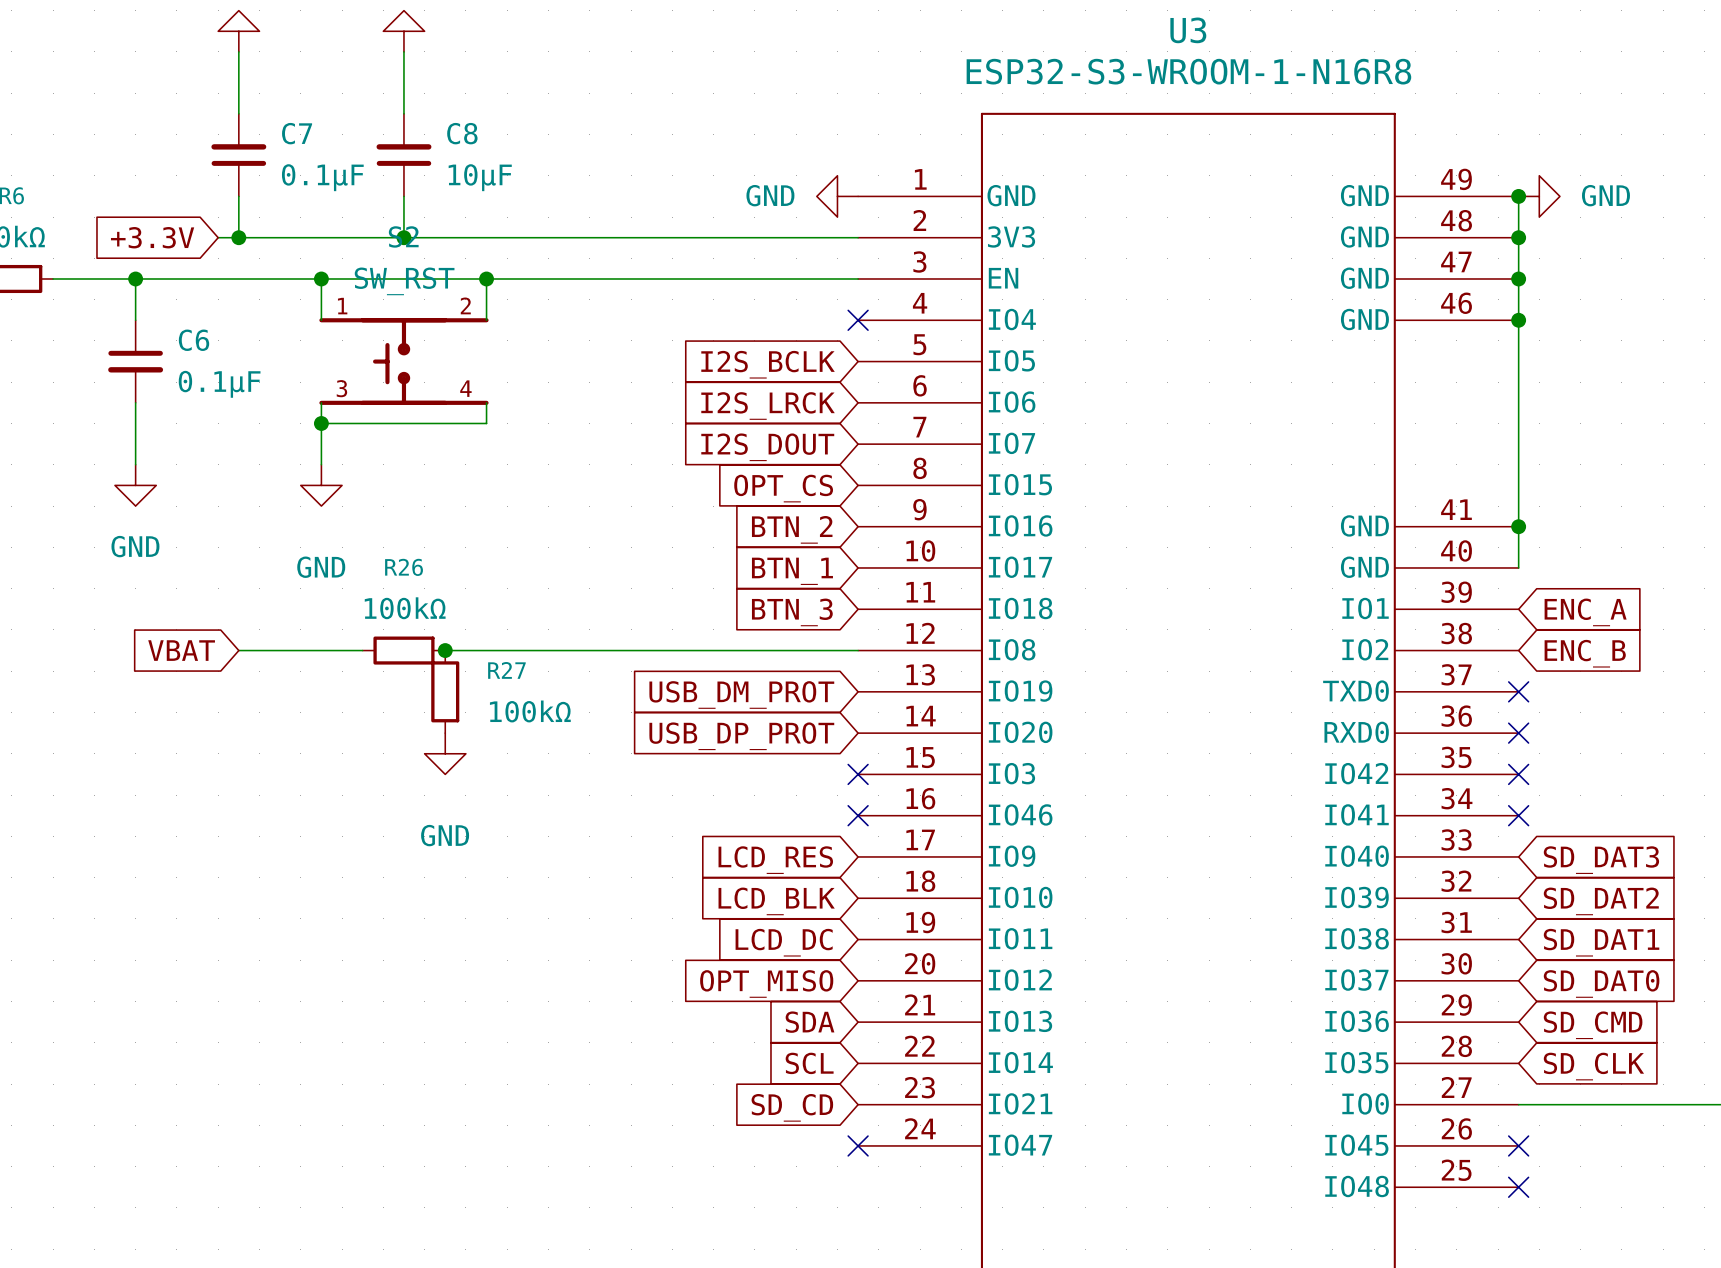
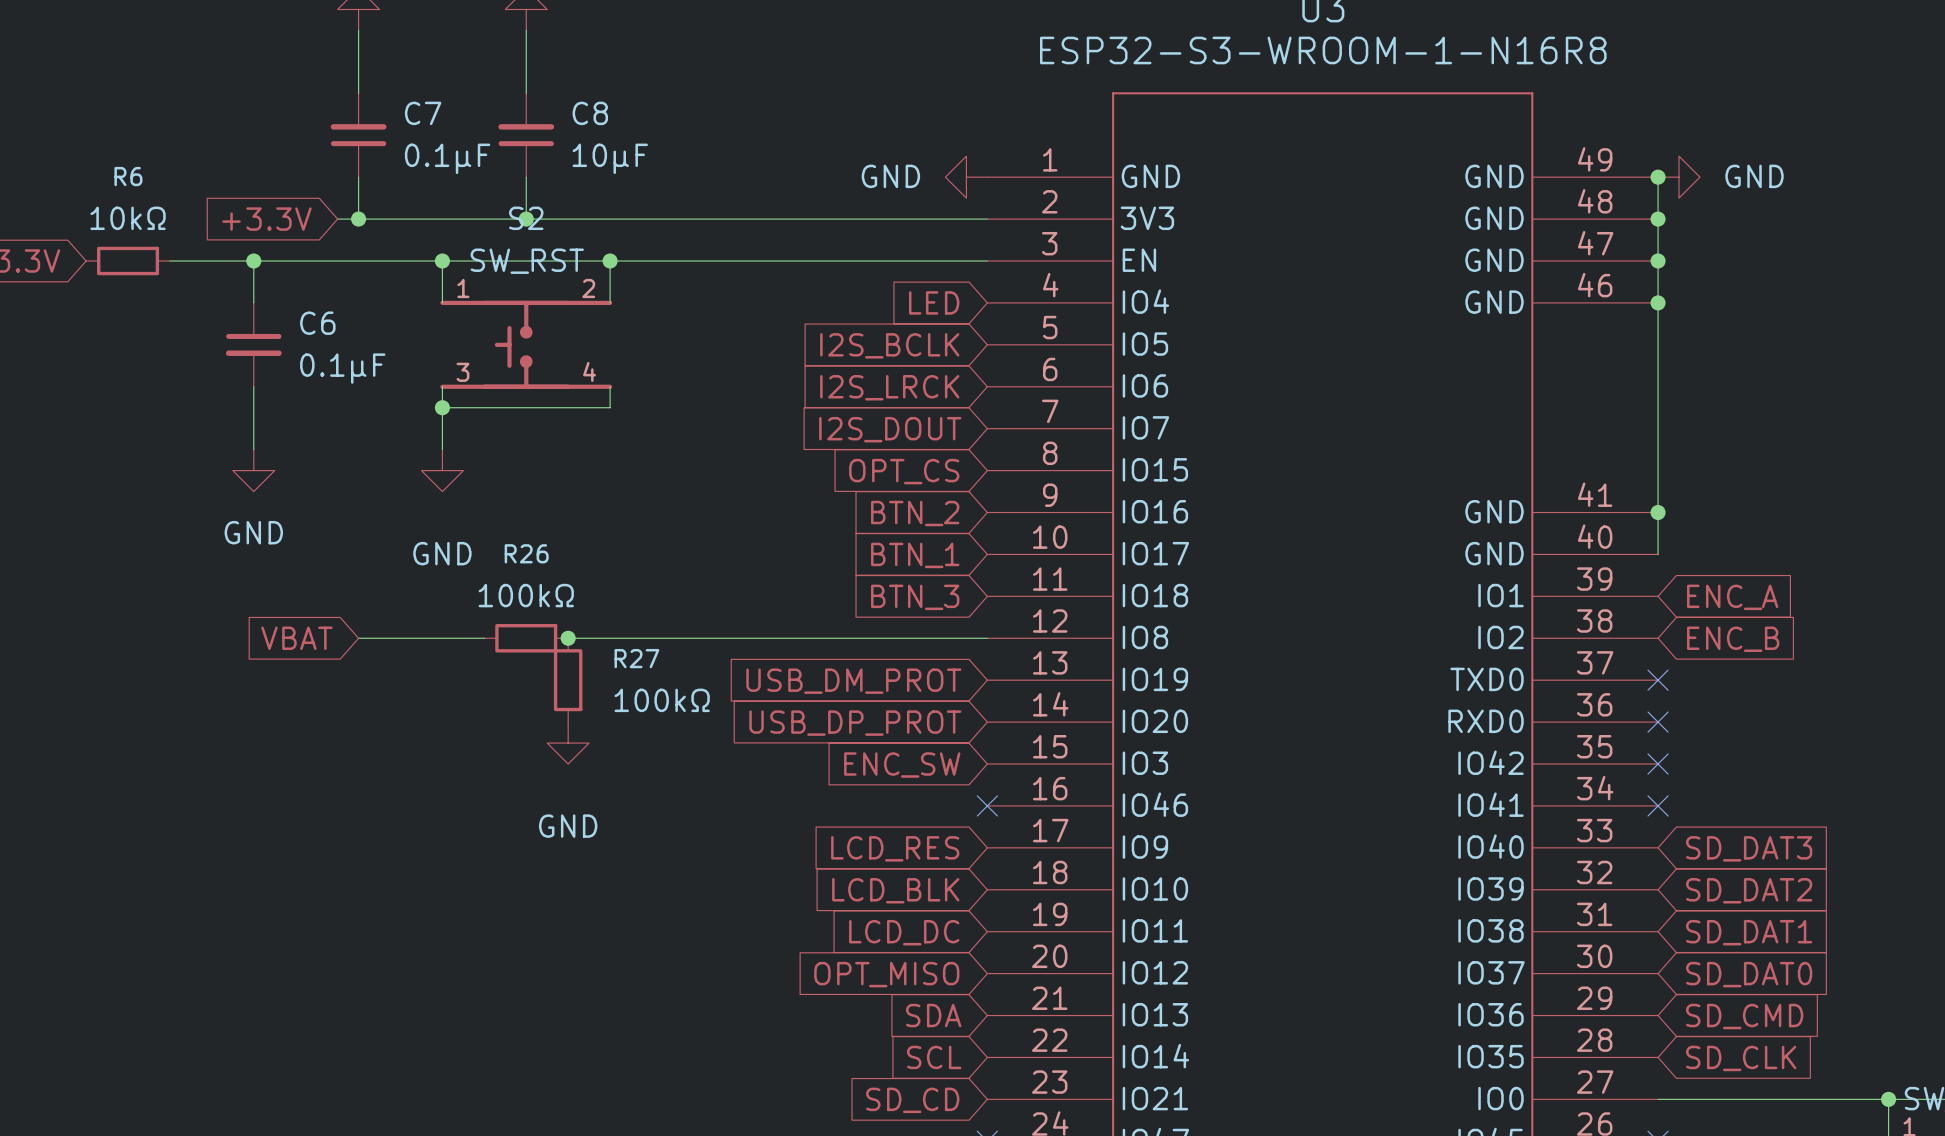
global label: none -> LED (934, 302)
no-connect mark: (858, 320) -> none
no-connect mark: (858, 774) -> none
global label: none -> ENC_SW (902, 765)

